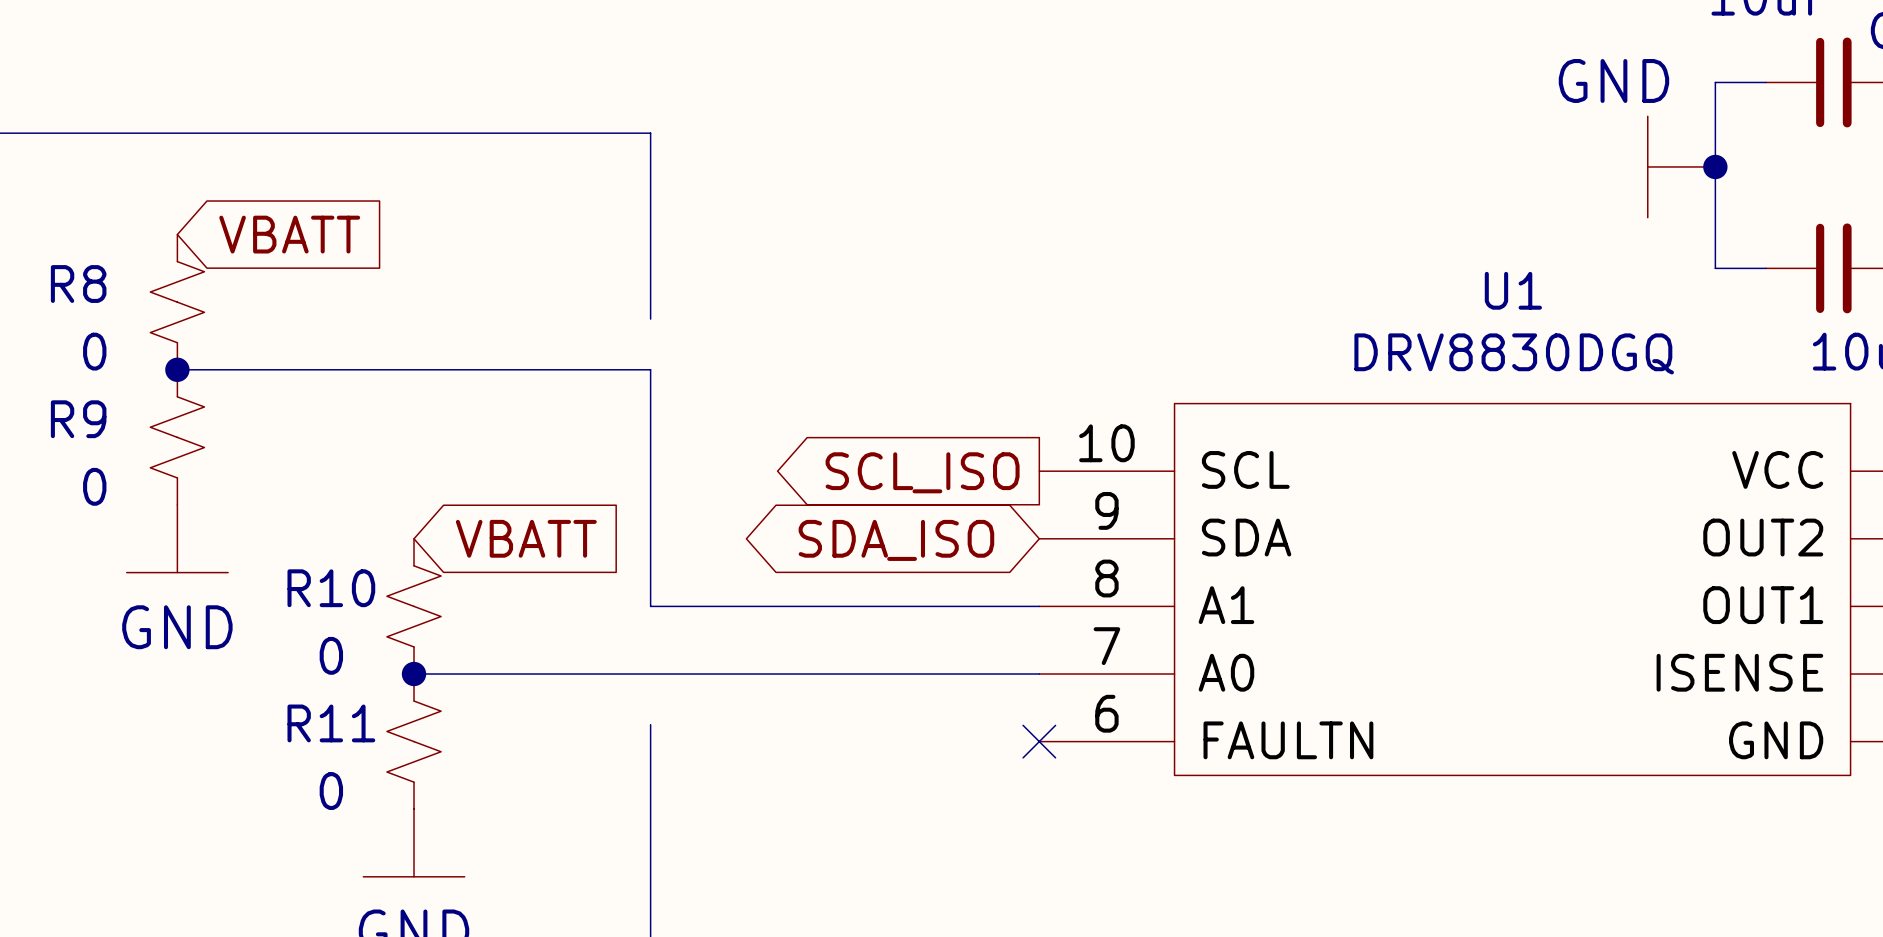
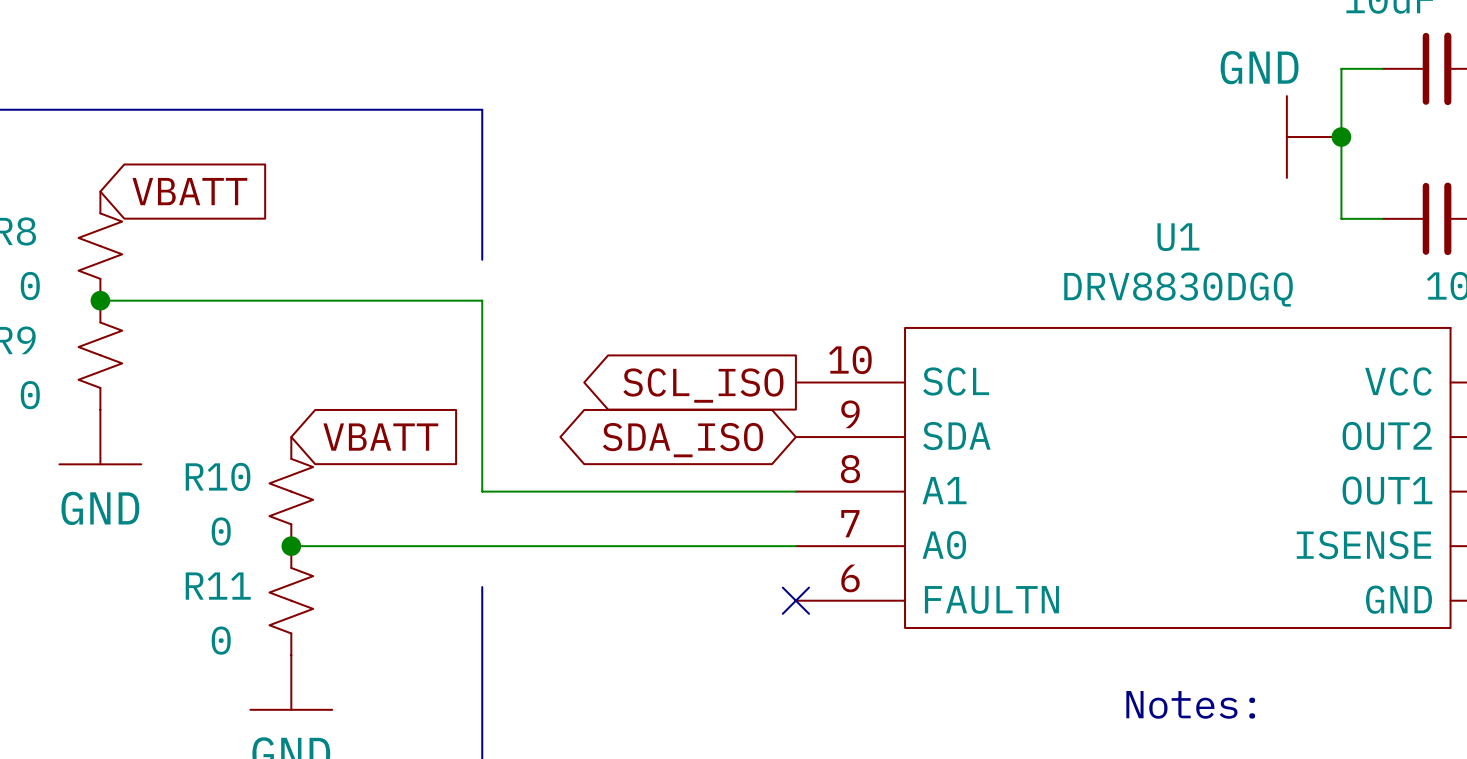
text: none -> Notes: (1190, 704)

